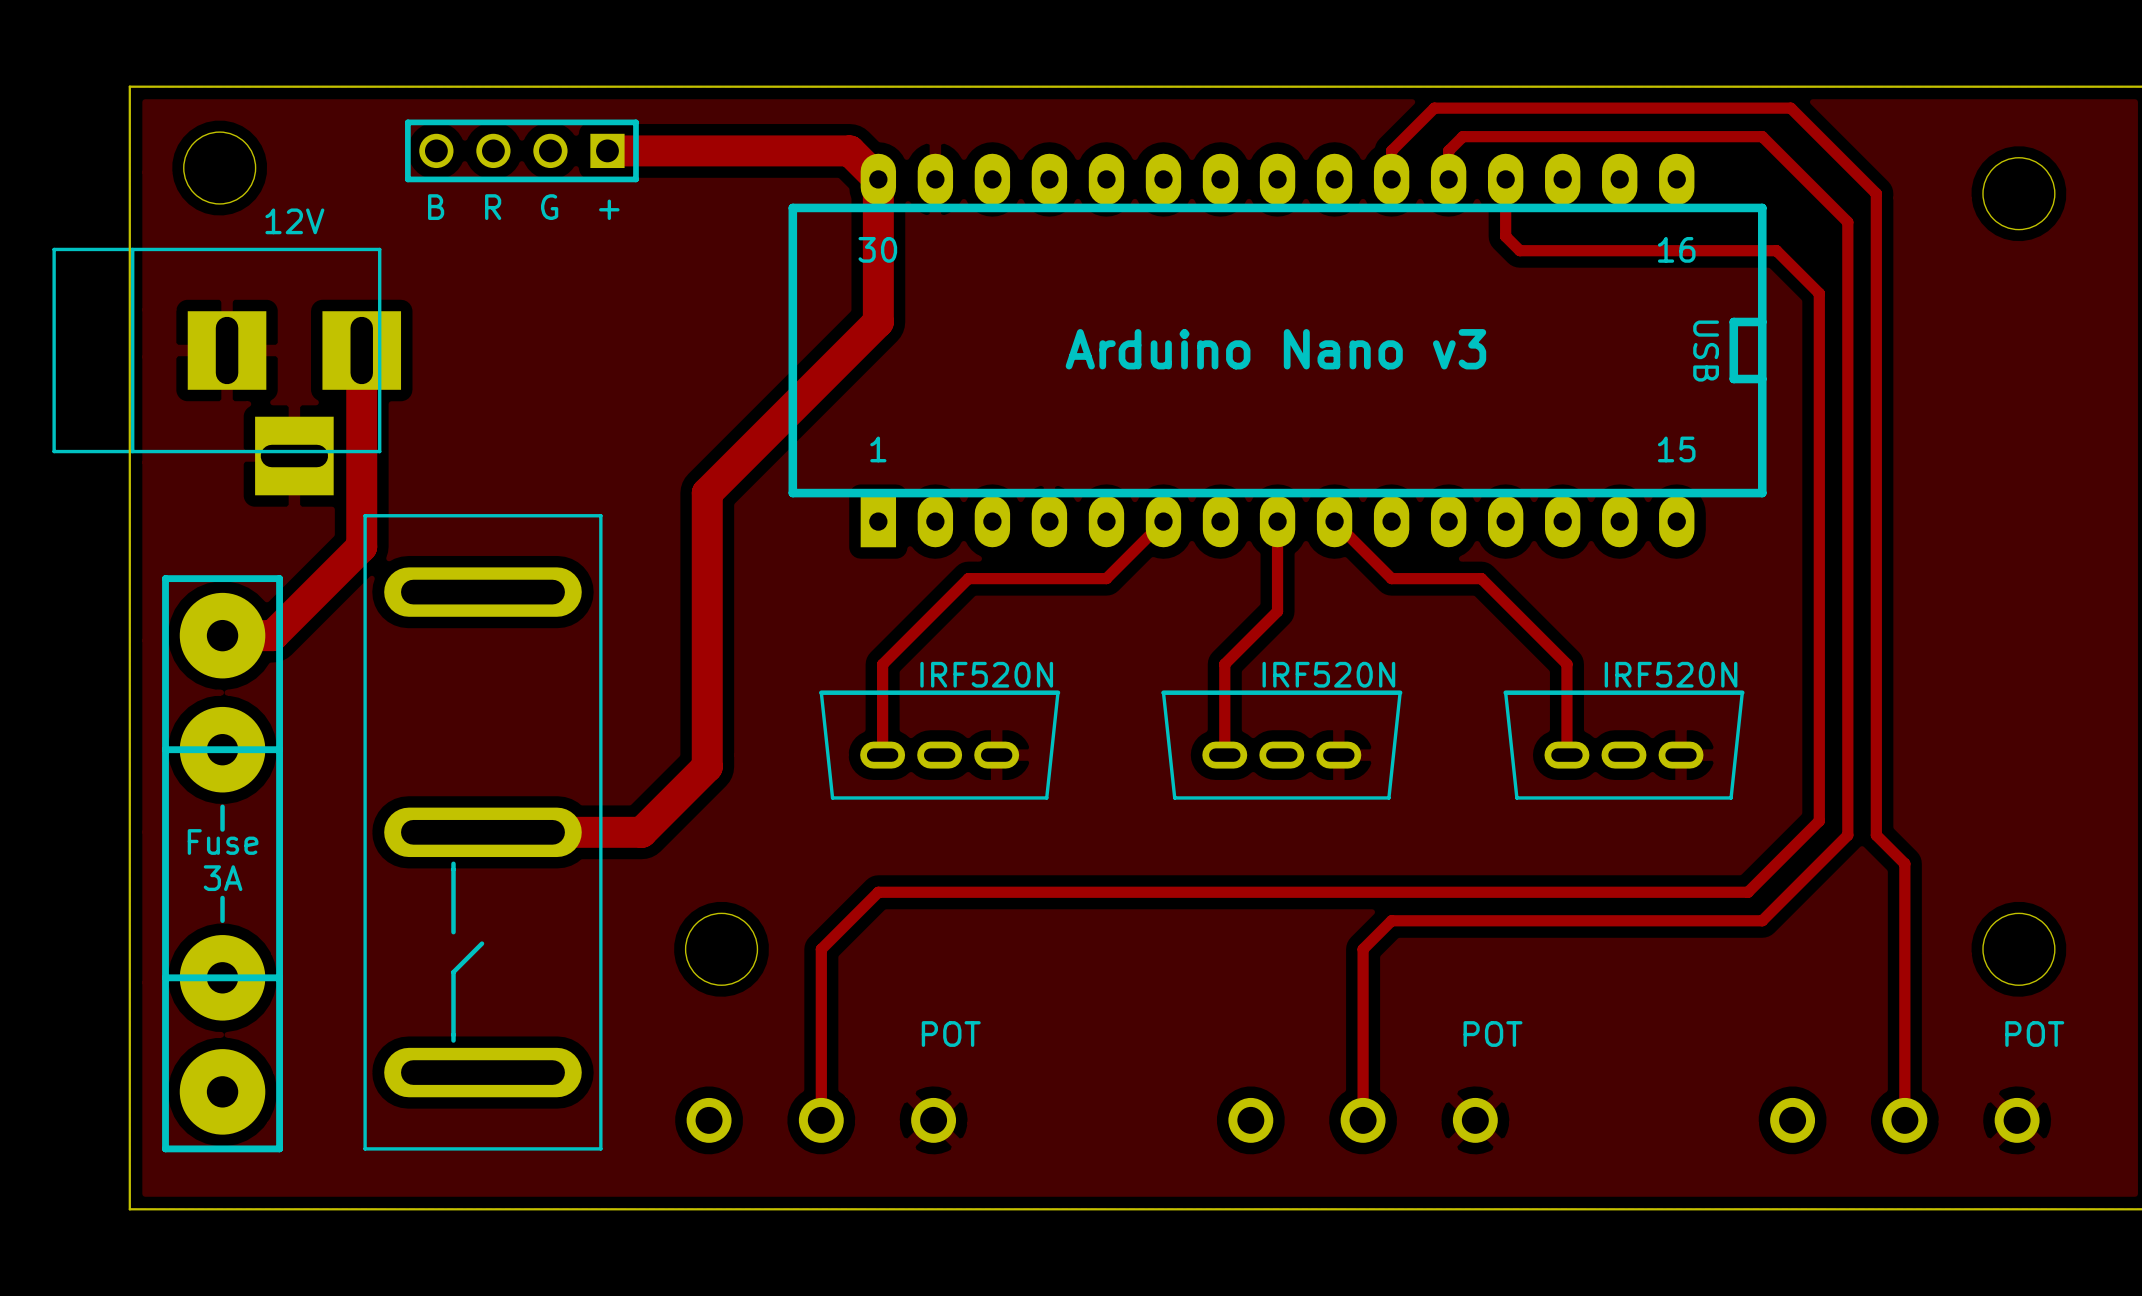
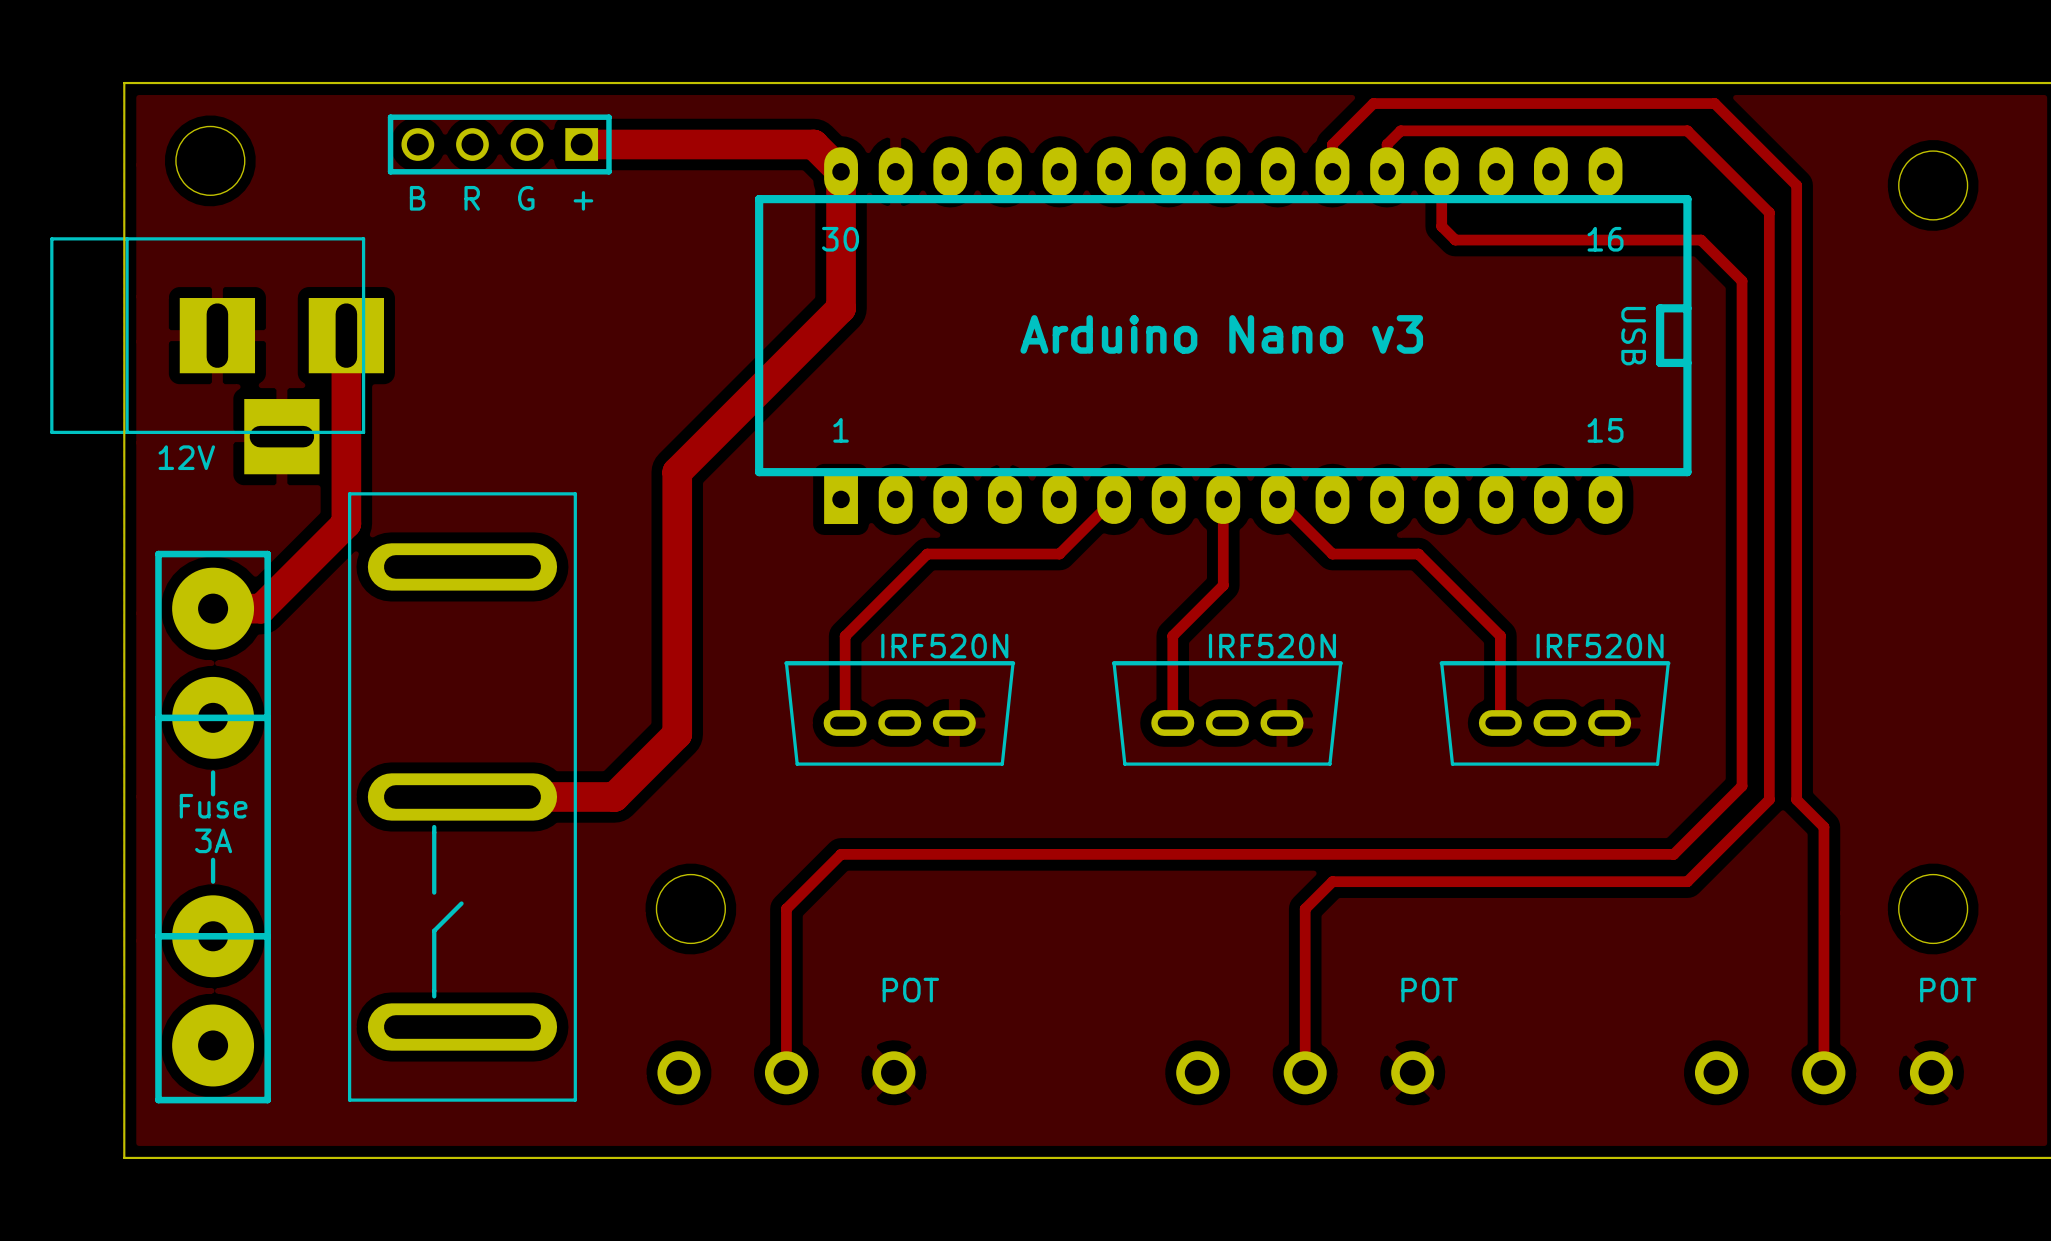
text position: 12V (294, 221) -> 12V (186, 457)

